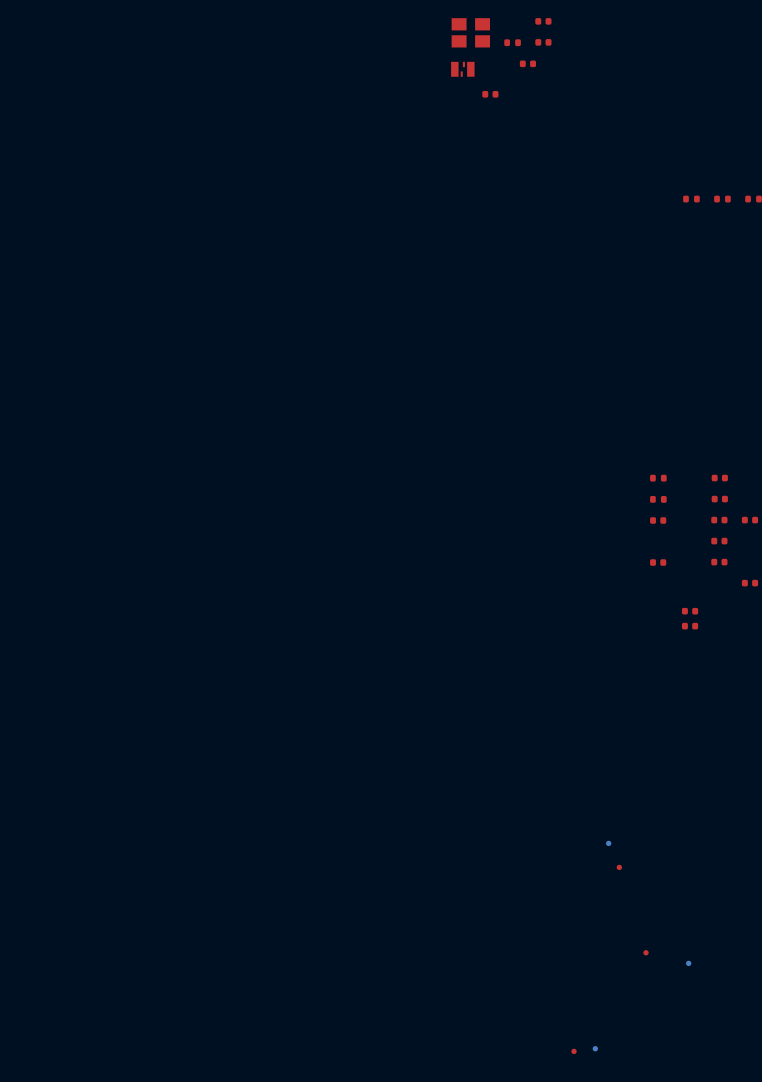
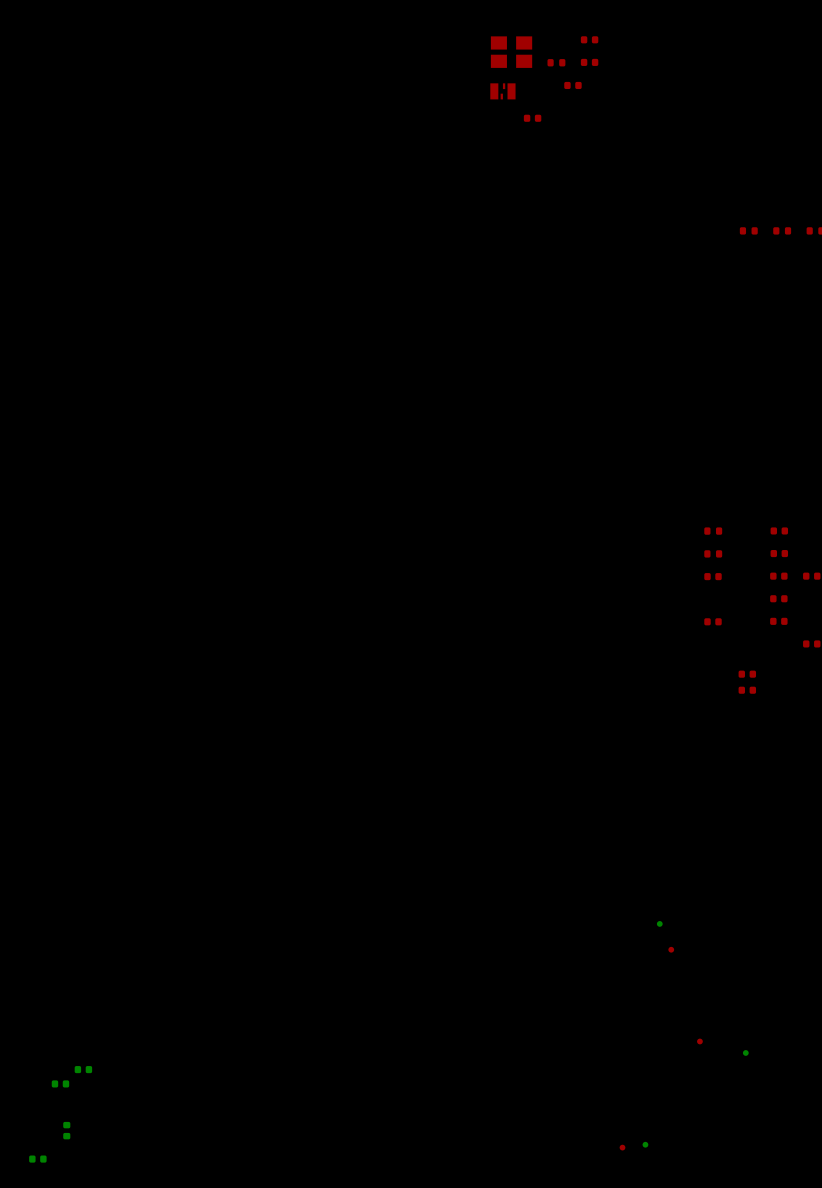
part: none -> (83, 1069)
part: none -> (60, 1083)
part: none -> (66, 1130)
part: none -> (37, 1159)

